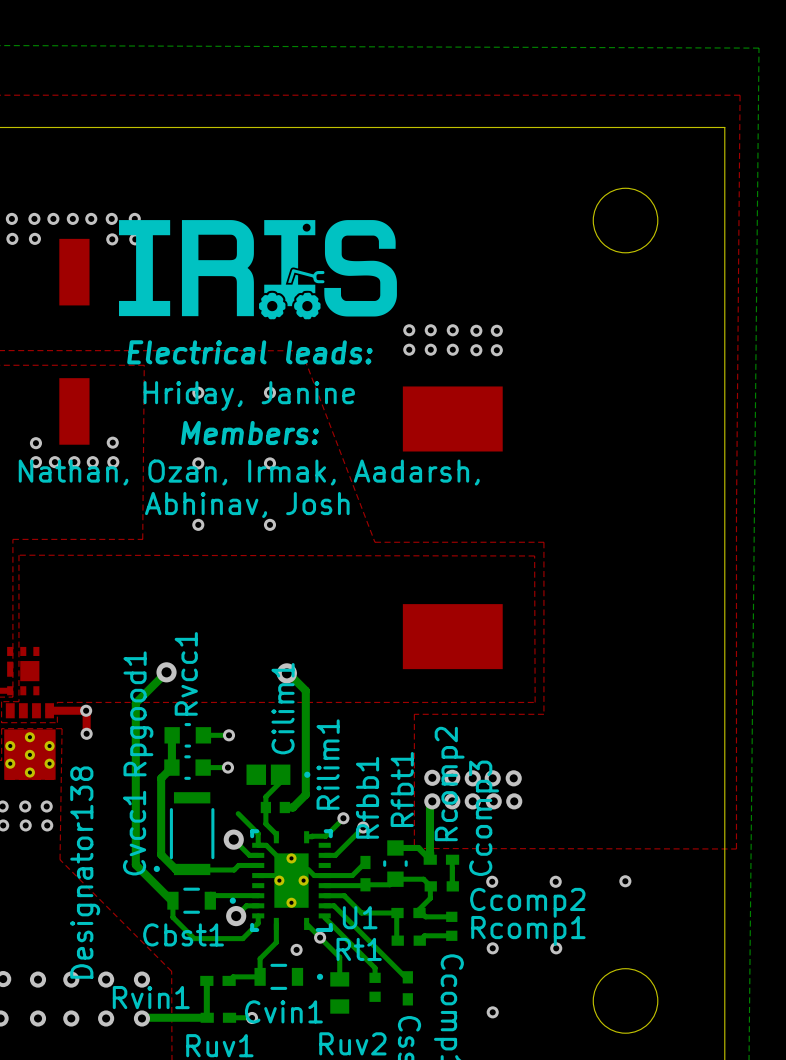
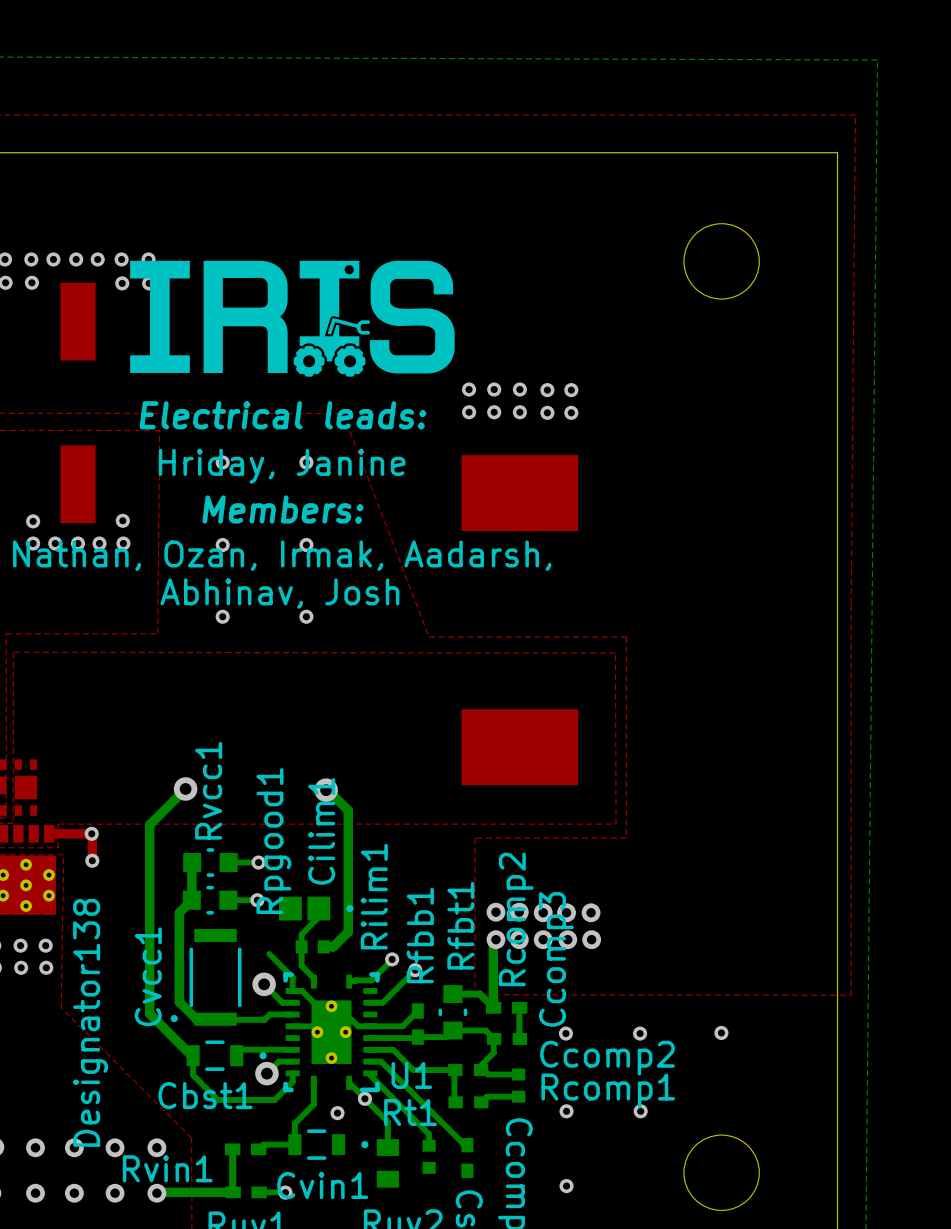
Rpgood1 name position: Rpgood1 (138, 713) -> Rpgood1 (273, 841)

